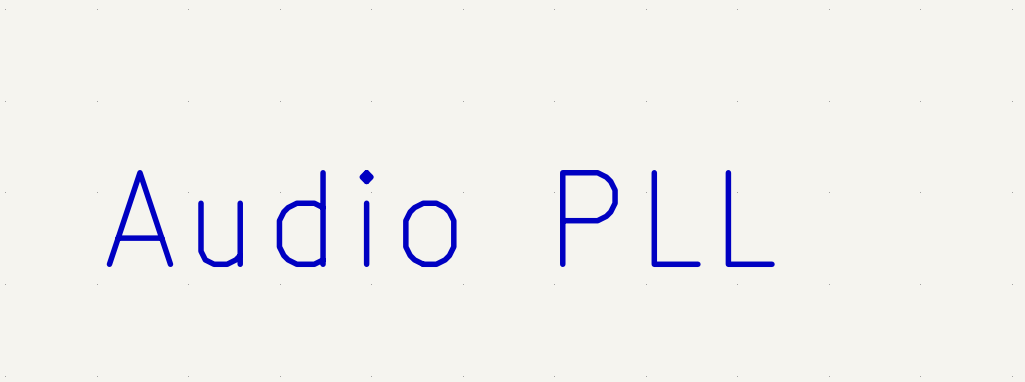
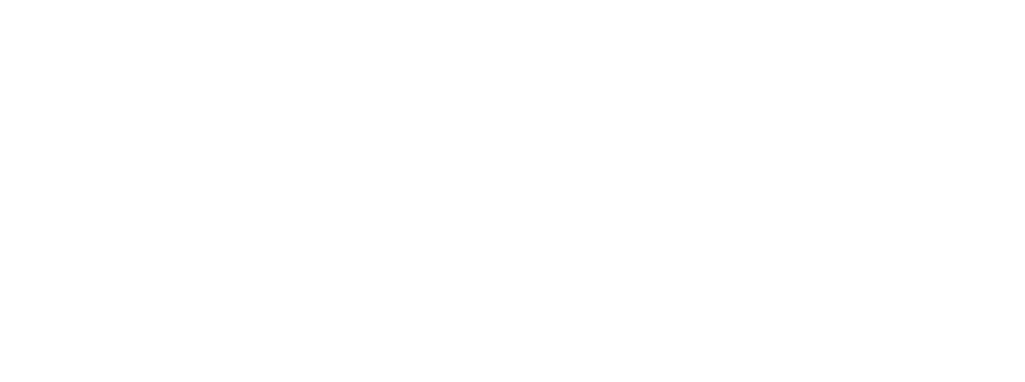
text: Audio PLL (440, 218) -> none

